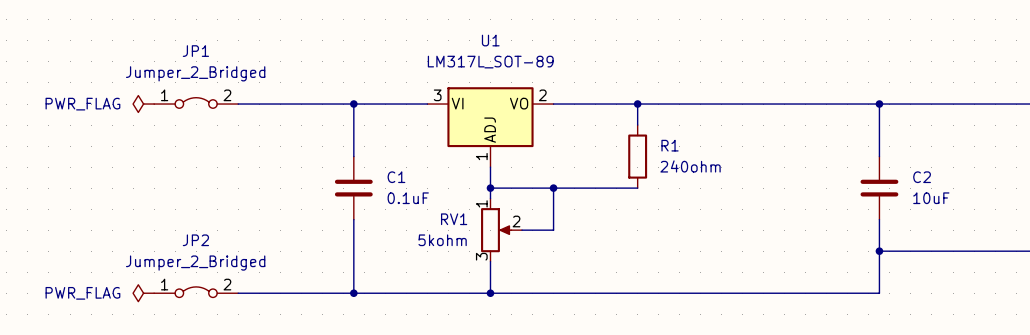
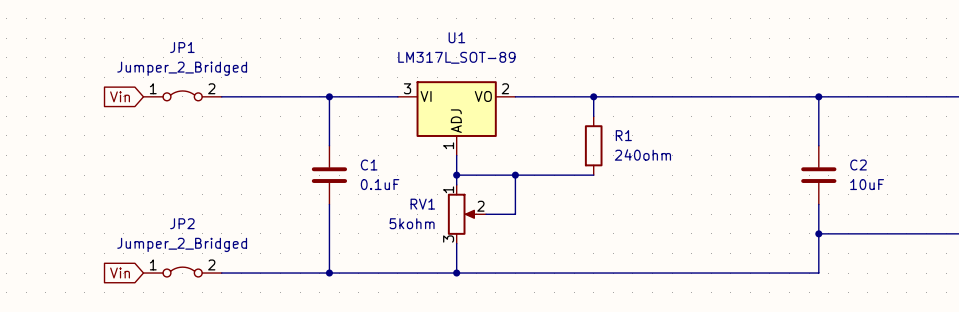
global label: none -> Vin (120, 96)
power symbol: PWR_FLAG (143, 104) -> none
global label: none -> Vin (120, 273)
power symbol: PWR_FLAG (143, 293) -> none

